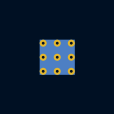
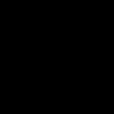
part: (57, 57) -> none

